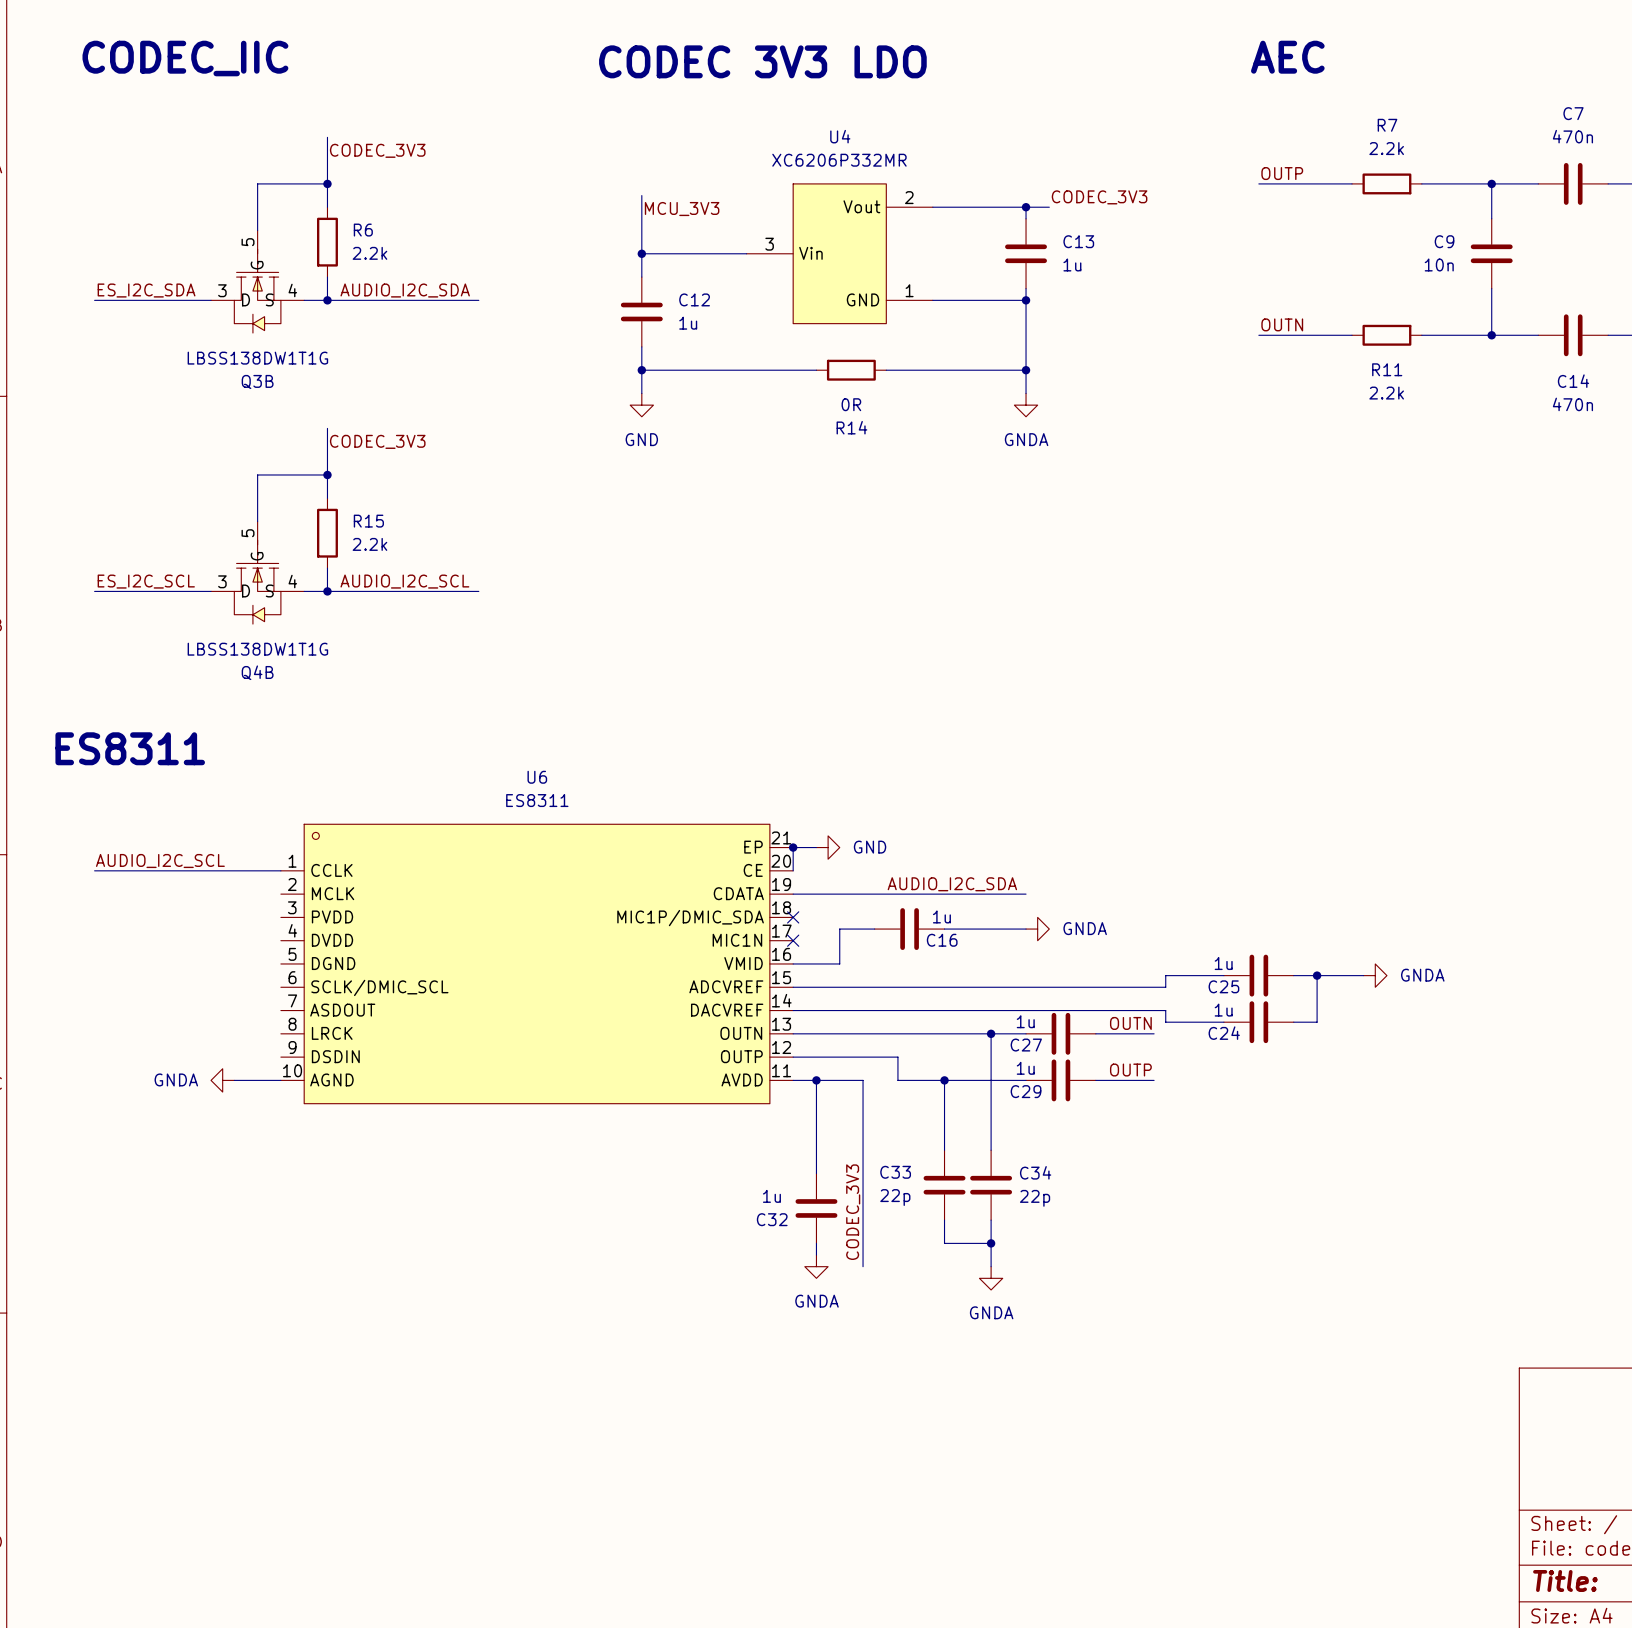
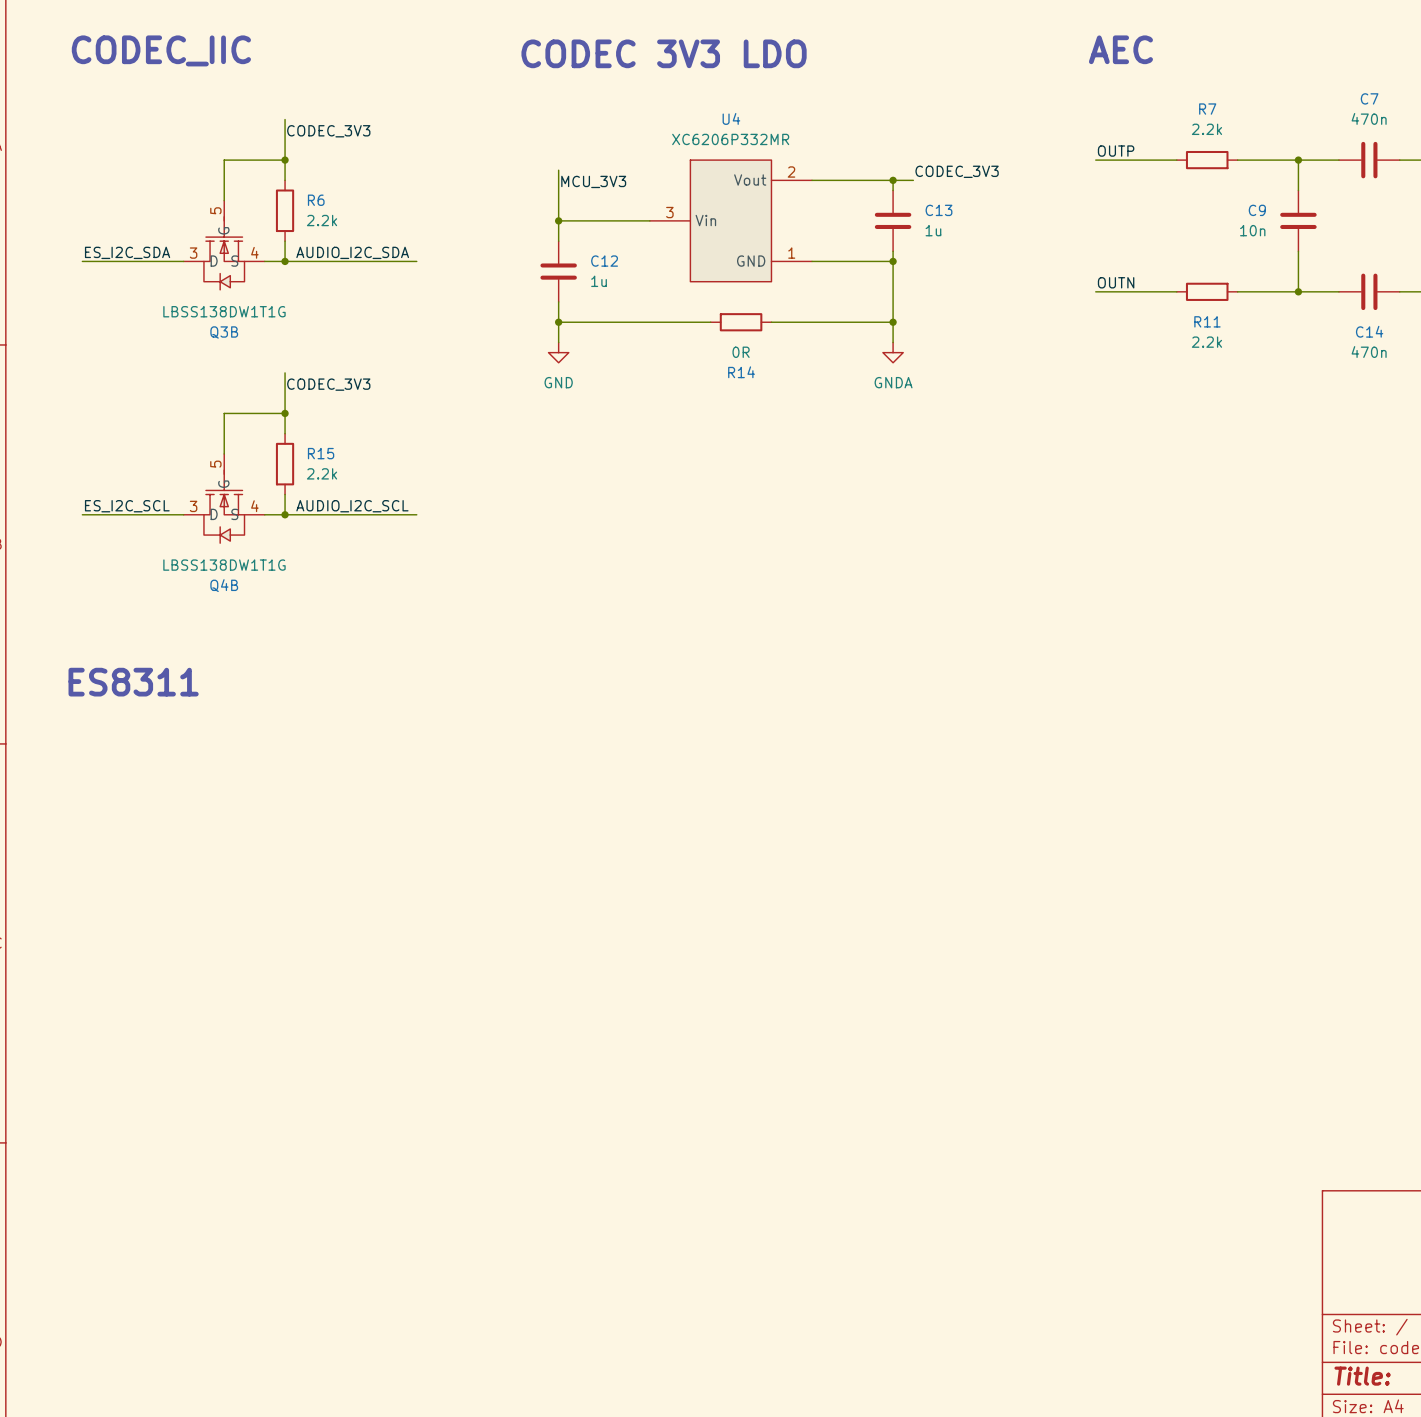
text position: ES8311 (130, 748) -> ES8311 (133, 682)
junction: (793, 847) -> none
wire: (816, 847) (793, 847) (793, 870) -> none
power symbol: GND (828, 847) -> none
label: AUDIO_I2C_SCL (160, 861) -> none
wire: (94, 870) (280, 870) -> none
label: AUDIO_I2C_SDA (952, 884) -> none
wire: (793, 894) (1026, 894) -> none
no-connect mark: (793, 917) -> none
wire: (874, 929) (839, 929) (839, 963) (793, 963) -> none
C16: 1u (909, 929) -> none
wire: (944, 929) (1026, 929) -> none
power symbol: GNDA (1037, 929) -> none
no-connect mark: (793, 940) -> none
U6: ES8311 (537, 963) -> none
wire: (1223, 975) (1165, 975) (1165, 987) (793, 987) -> none
C25: 1u (1258, 975) -> none
wire: (1293, 975) (1363, 975) -> none
wire: (1317, 975) (1317, 1022) (1293, 1022) -> none
junction: (1317, 975) -> none
power symbol: GNDA (1375, 975) -> none
wire: (793, 1010) (1165, 1010) (1165, 1022) (1223, 1022) -> none
C24: 1u (1258, 1022) -> none
label: OUTN (1130, 1023) -> none
wire: (793, 1033) (1026, 1033) -> none
wire: (991, 1033) (991, 1150) -> none
junction: (991, 1033) -> none
C27: 1u (1060, 1033) -> none
wire: (1095, 1033) (1154, 1033) -> none
wire: (793, 1057) (897, 1057) (897, 1080) (1026, 1080) -> none
label: OUTP (1130, 1070) -> none
power symbol: GNDA (222, 1080) -> none
wire: (234, 1080) (280, 1080) -> none
wire: (793, 1080) (863, 1080) (863, 1266) -> none
wire: (816, 1080) (816, 1173) -> none
junction: (816, 1080) -> none
wire: (944, 1080) (944, 1150) -> none
junction: (944, 1080) -> none
C29: 1u (1060, 1080) -> none
wire: (1095, 1080) (1154, 1080) -> none
C33: 22p (944, 1185) -> none
C34: 22p (991, 1185) -> none
C32: 1u (816, 1208) -> none
label: CODEC_3V3 (853, 1212) -> none
wire: (944, 1220) (944, 1243) (991, 1243) -> none
wire: (991, 1220) (991, 1266) -> none
wire: (816, 1243) (816, 1255) -> none
junction: (991, 1243) -> none
power symbol: GNDA (816, 1266) -> none
power symbol: GNDA (991, 1278) -> none

